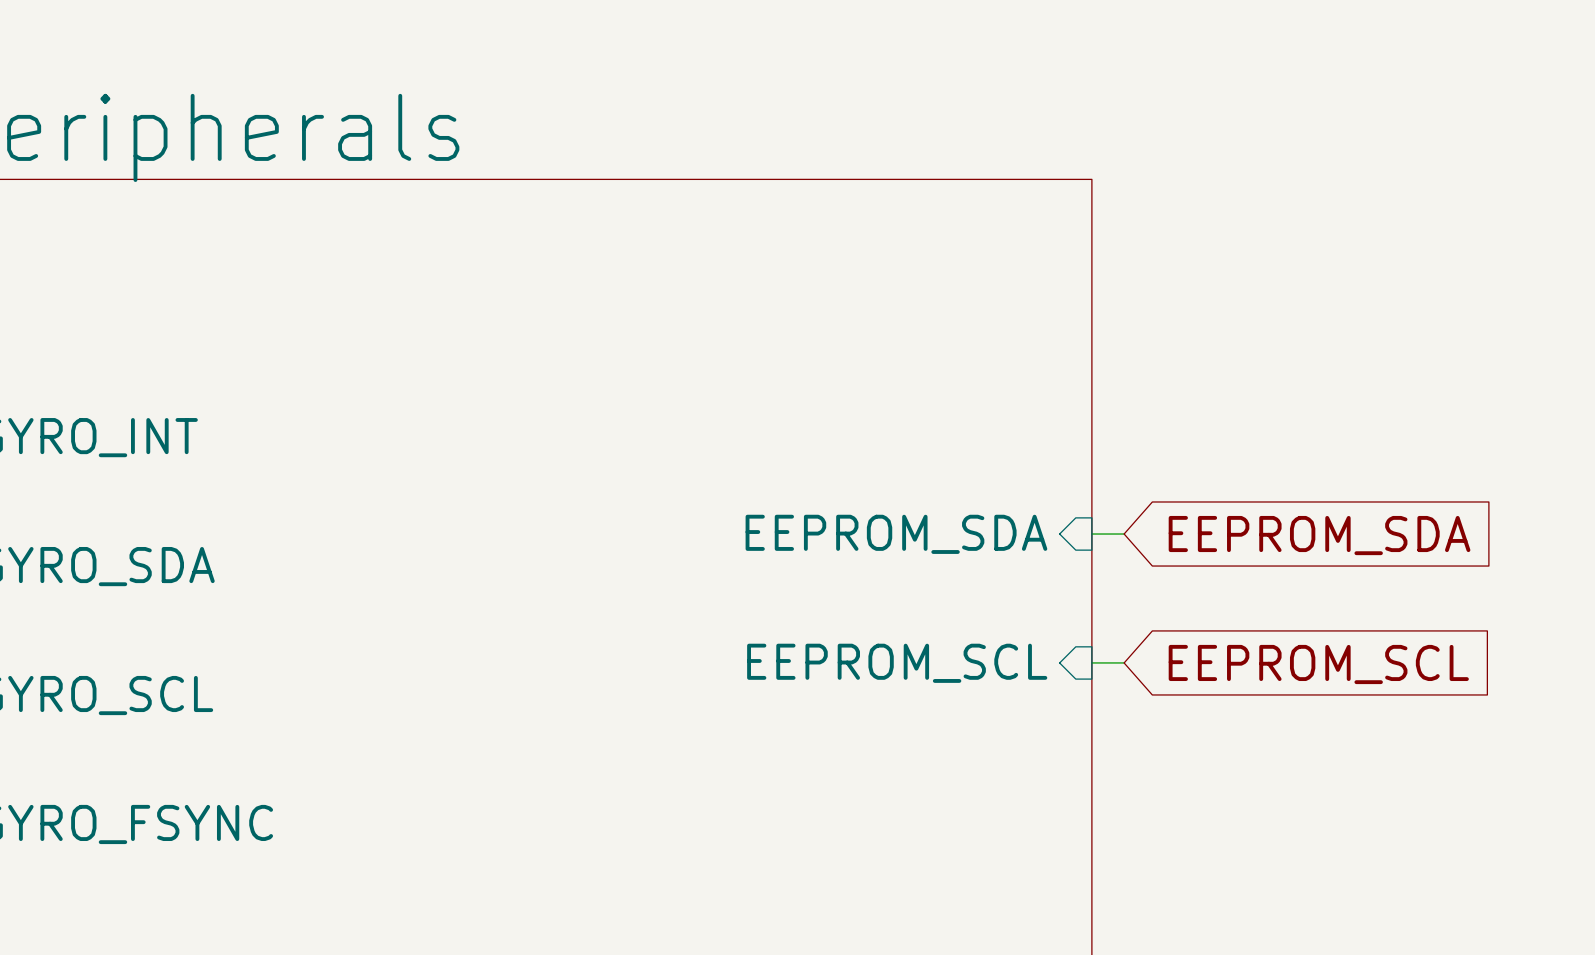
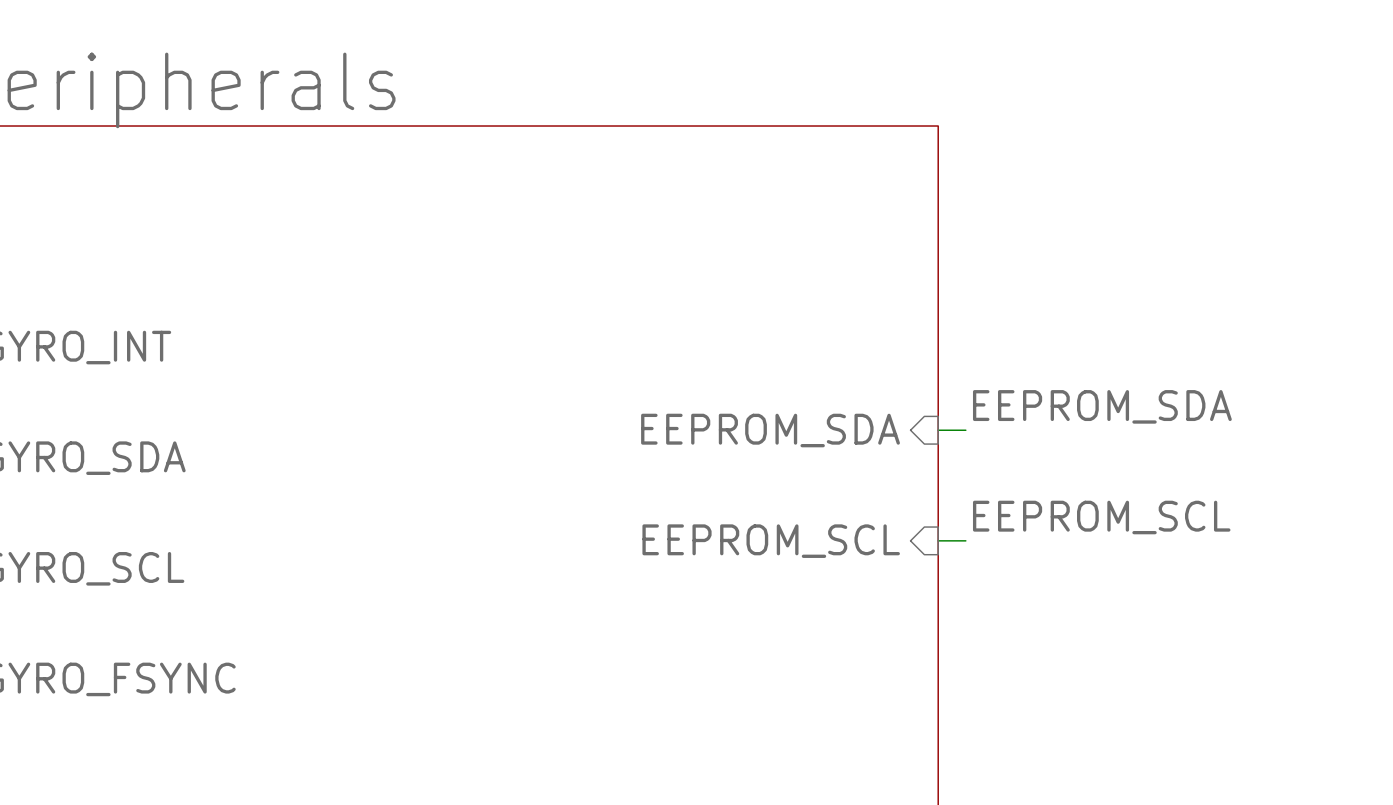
label: none -> EEPROM_SDA (1102, 406)
global label: EEPROM_SDA (1319, 535) -> none
label: none -> EEPROM_SCL (1101, 517)
global label: EEPROM_SCL (1318, 664) -> none

